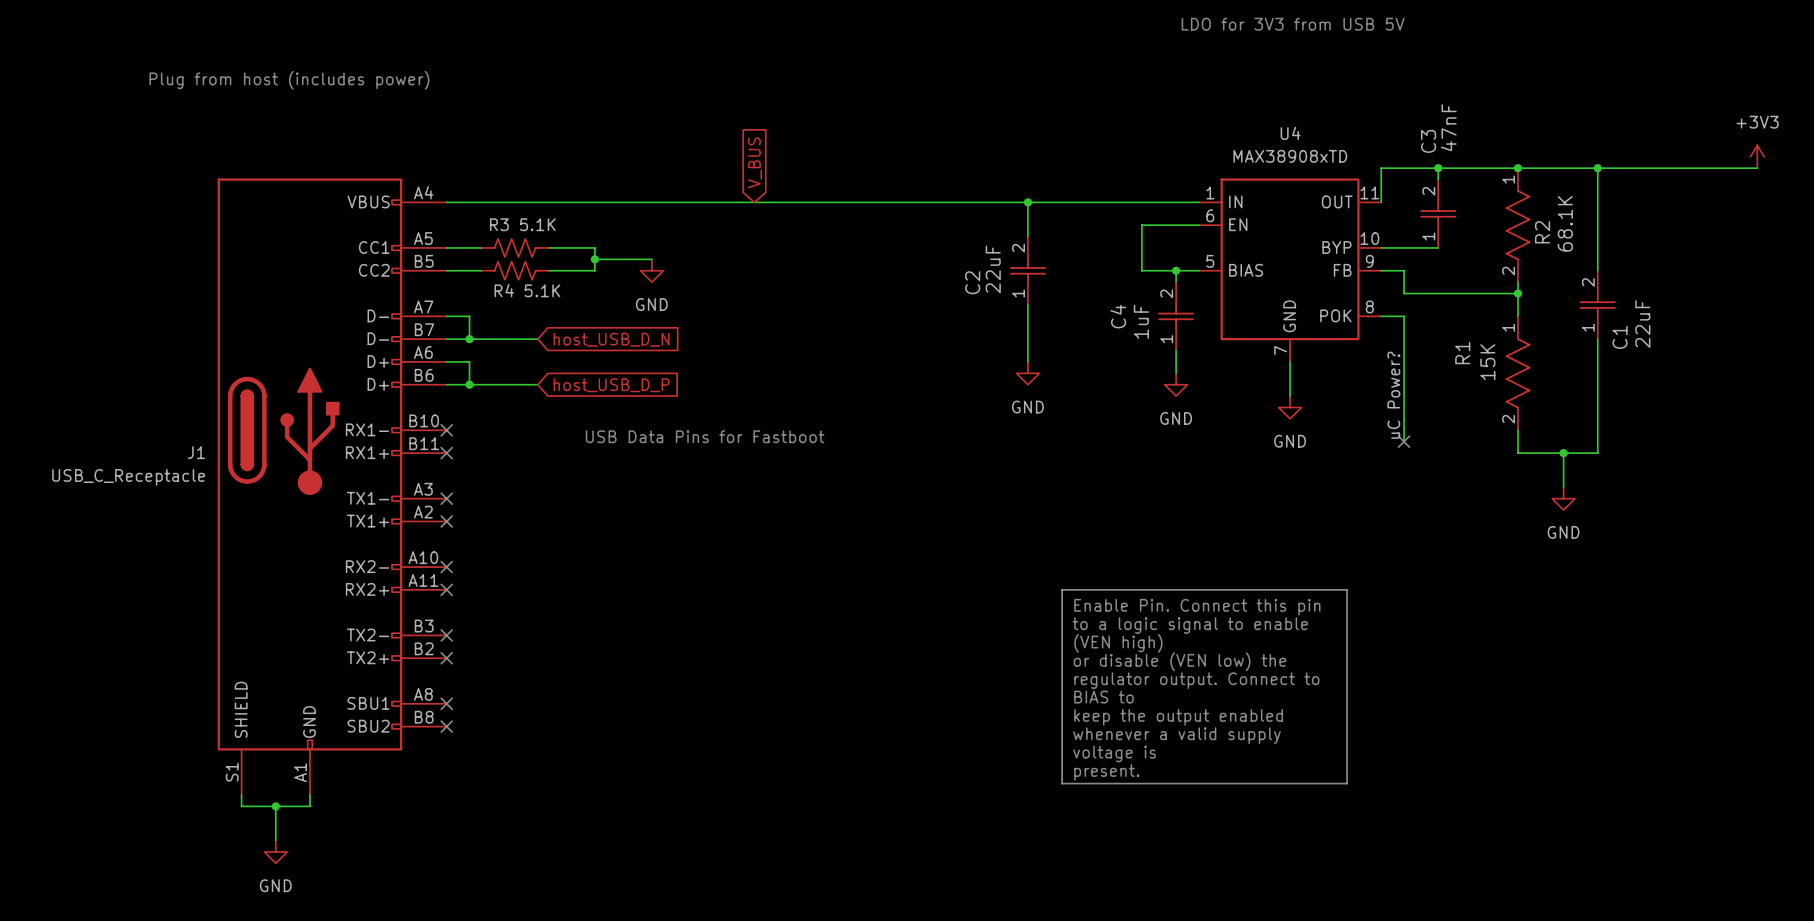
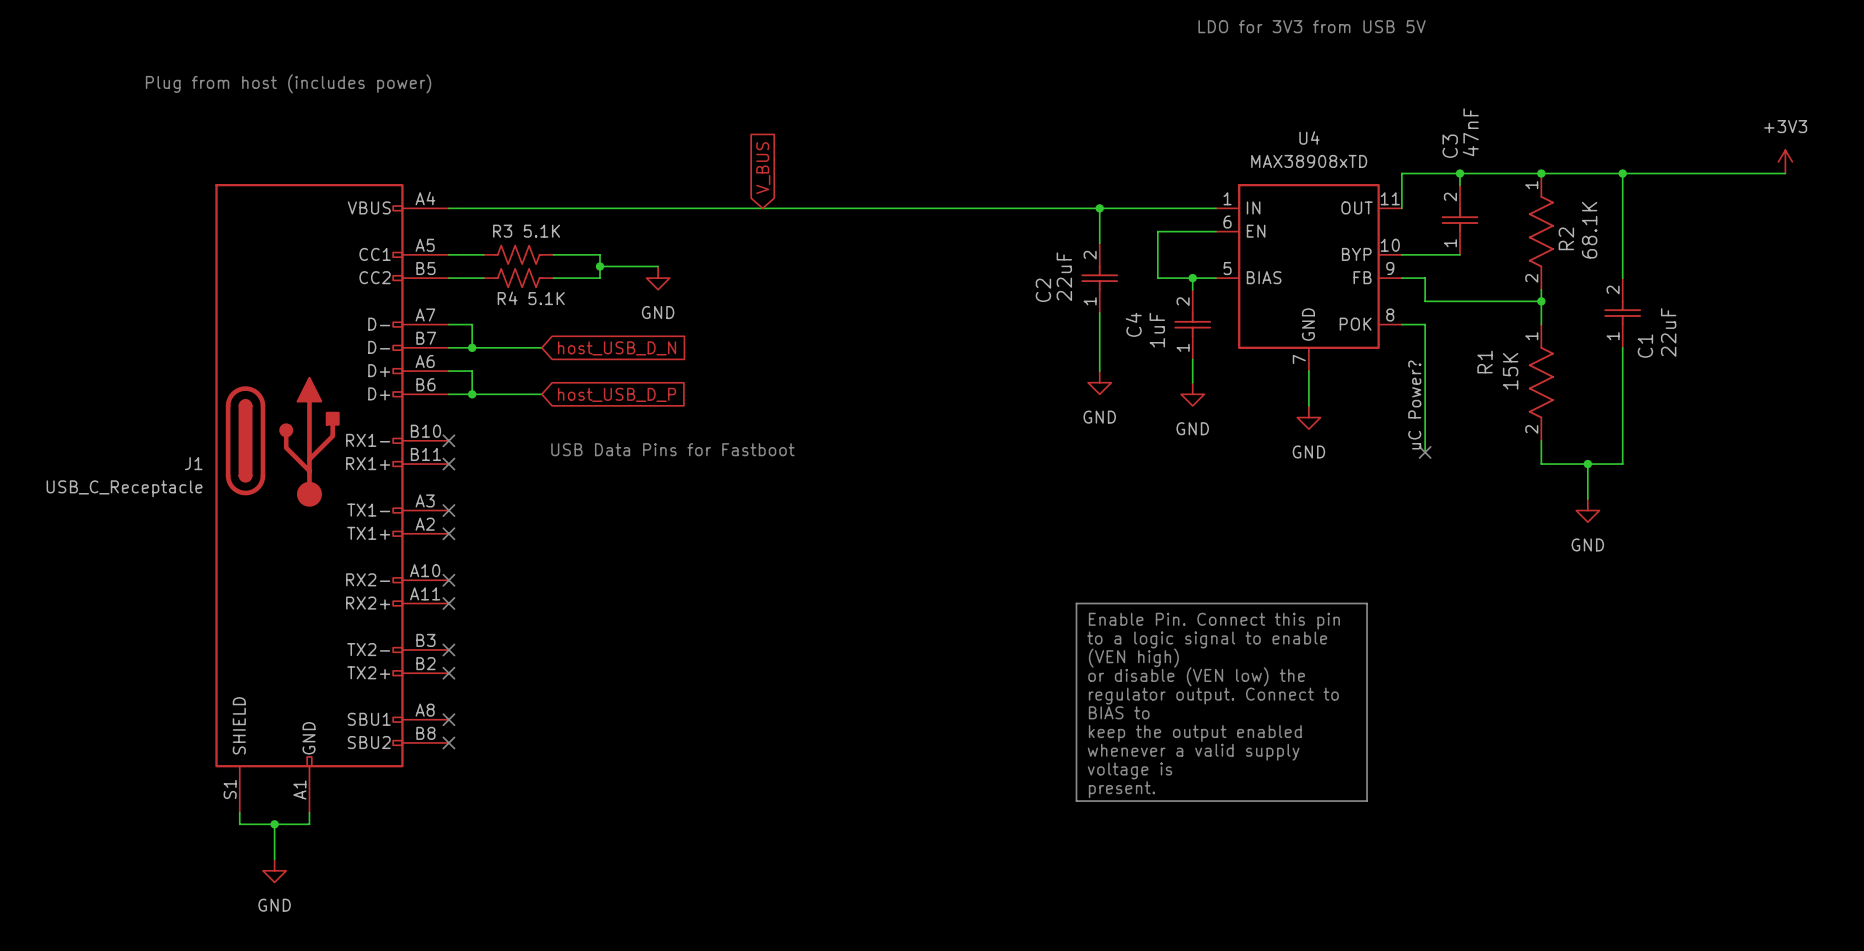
wire: (1027, 202) (1027, 236) -> (1099, 208) (1099, 243)
junction: (1027, 202) -> none
junction: none -> (1099, 208)
C2 position: (1027, 270) -> (1099, 278)
wire: (1027, 304) (1027, 361) -> (1099, 312) (1099, 371)
power symbol position: GND (1027, 373) -> GND (1099, 382)
text position: USB Data Pins for Fastboot (705, 436) -> USB Data Pins for Fastboot (672, 449)

